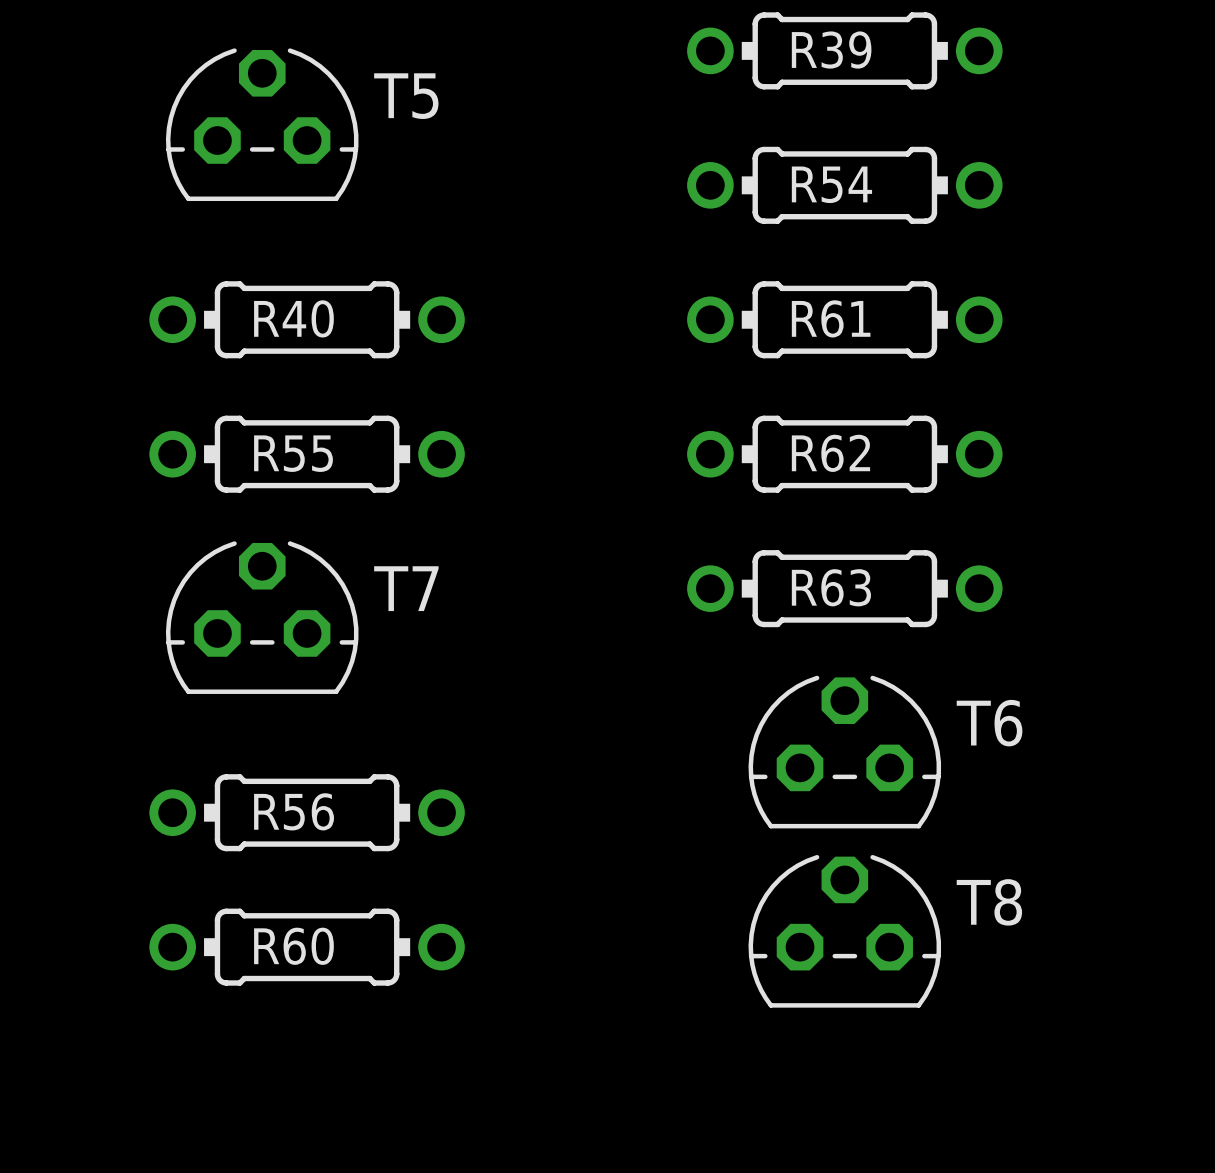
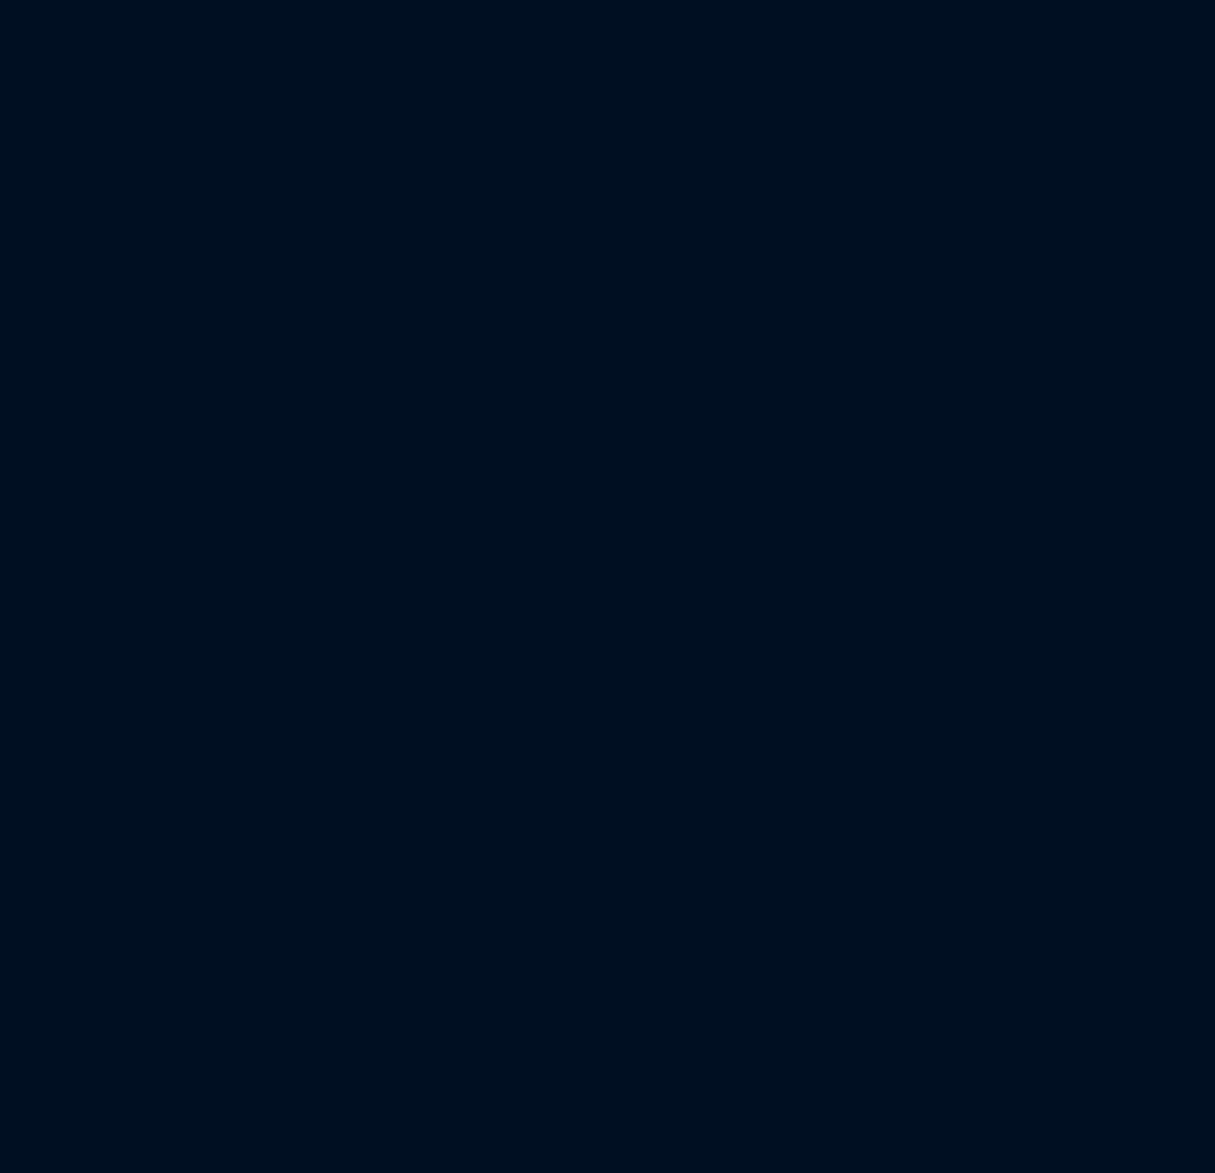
R39: (844, 50) -> none
T5: (262, 124) -> none
R54: (844, 185) -> none
R40: (307, 319) -> none
R61: (844, 319) -> none
R55: (307, 454) -> none
R62: (844, 454) -> none
R63: (844, 588) -> none
T7: (262, 617) -> none
T6: (844, 752) -> none
R56: (307, 812) -> none
T8: (844, 931) -> none
R60: (307, 947) -> none

